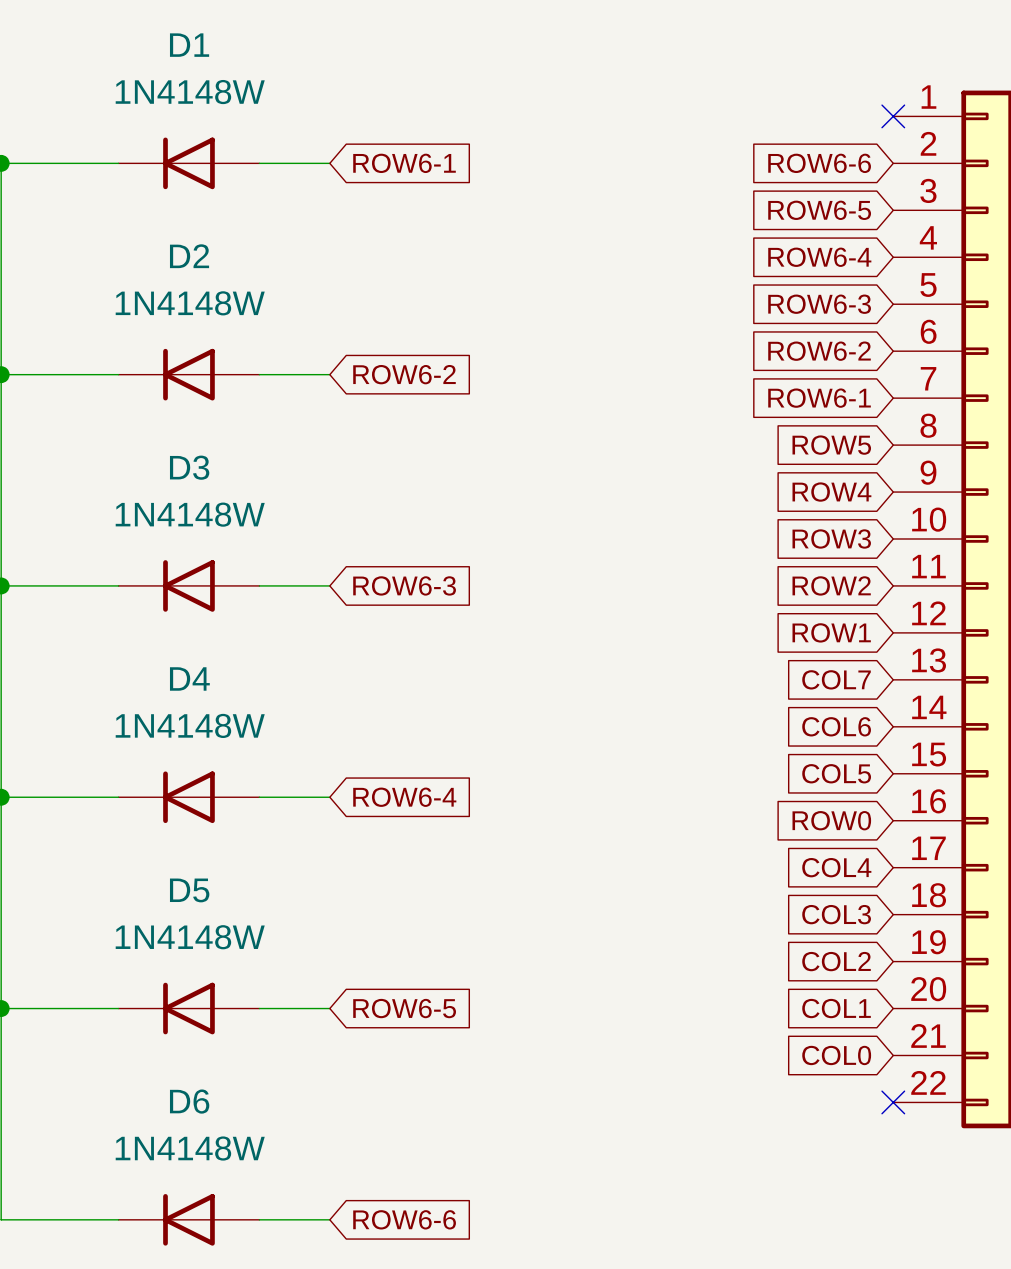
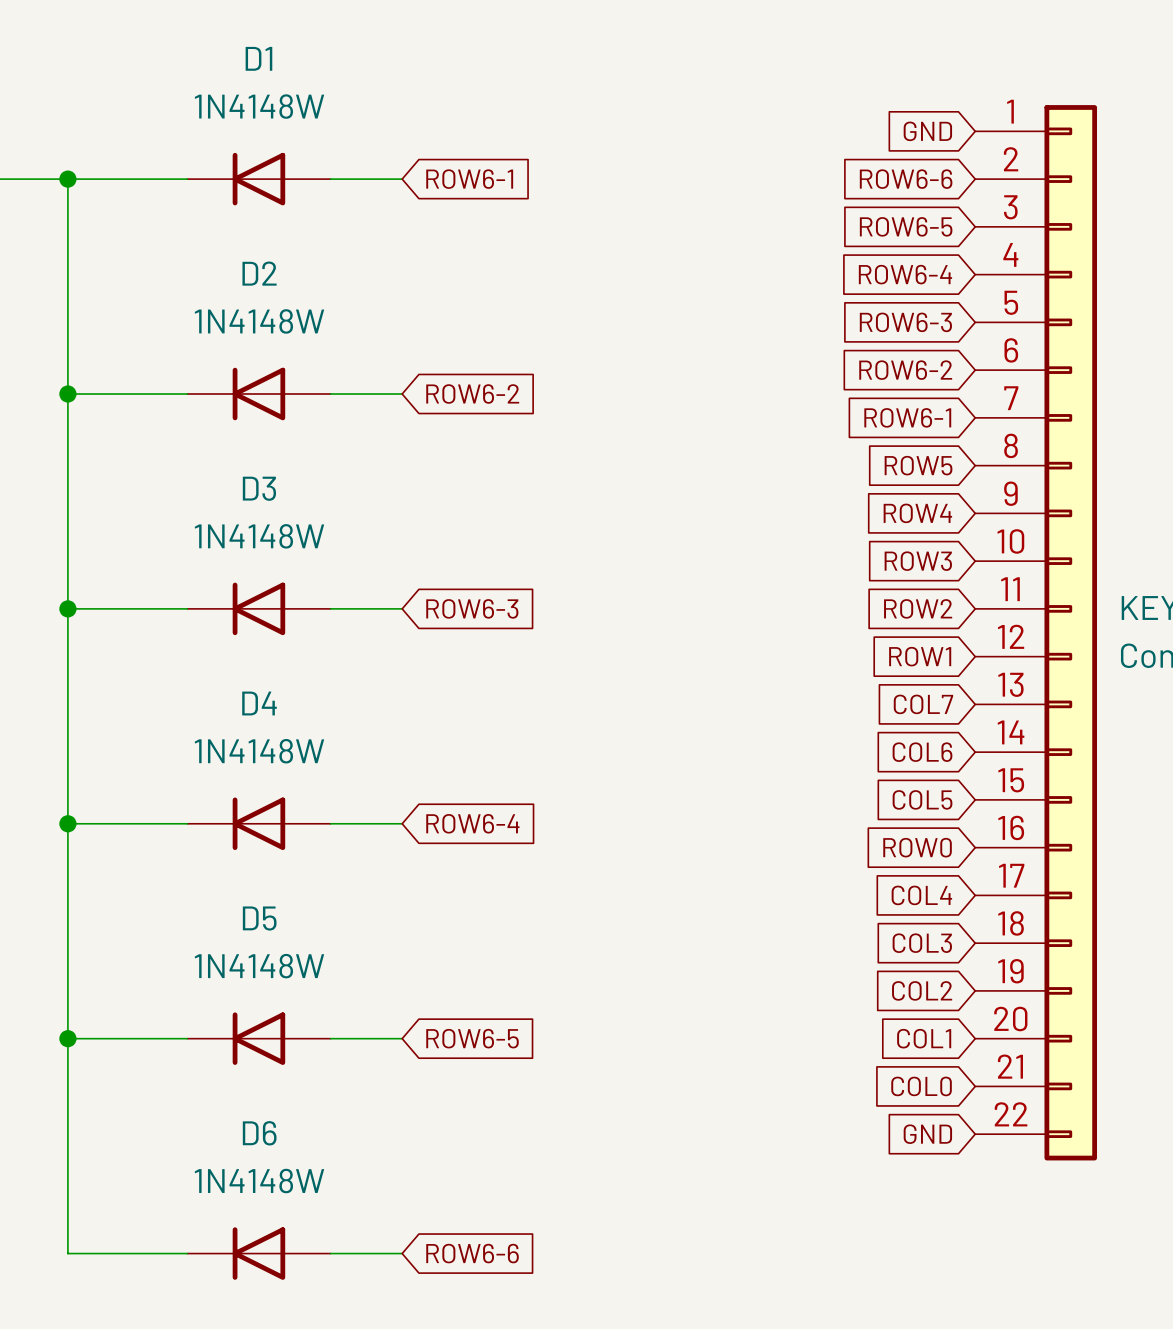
global label: none -> GND (927, 131)
no-connect mark: (893, 116) -> none
global label: none -> GND (927, 1134)
no-connect mark: (893, 1102) -> none

